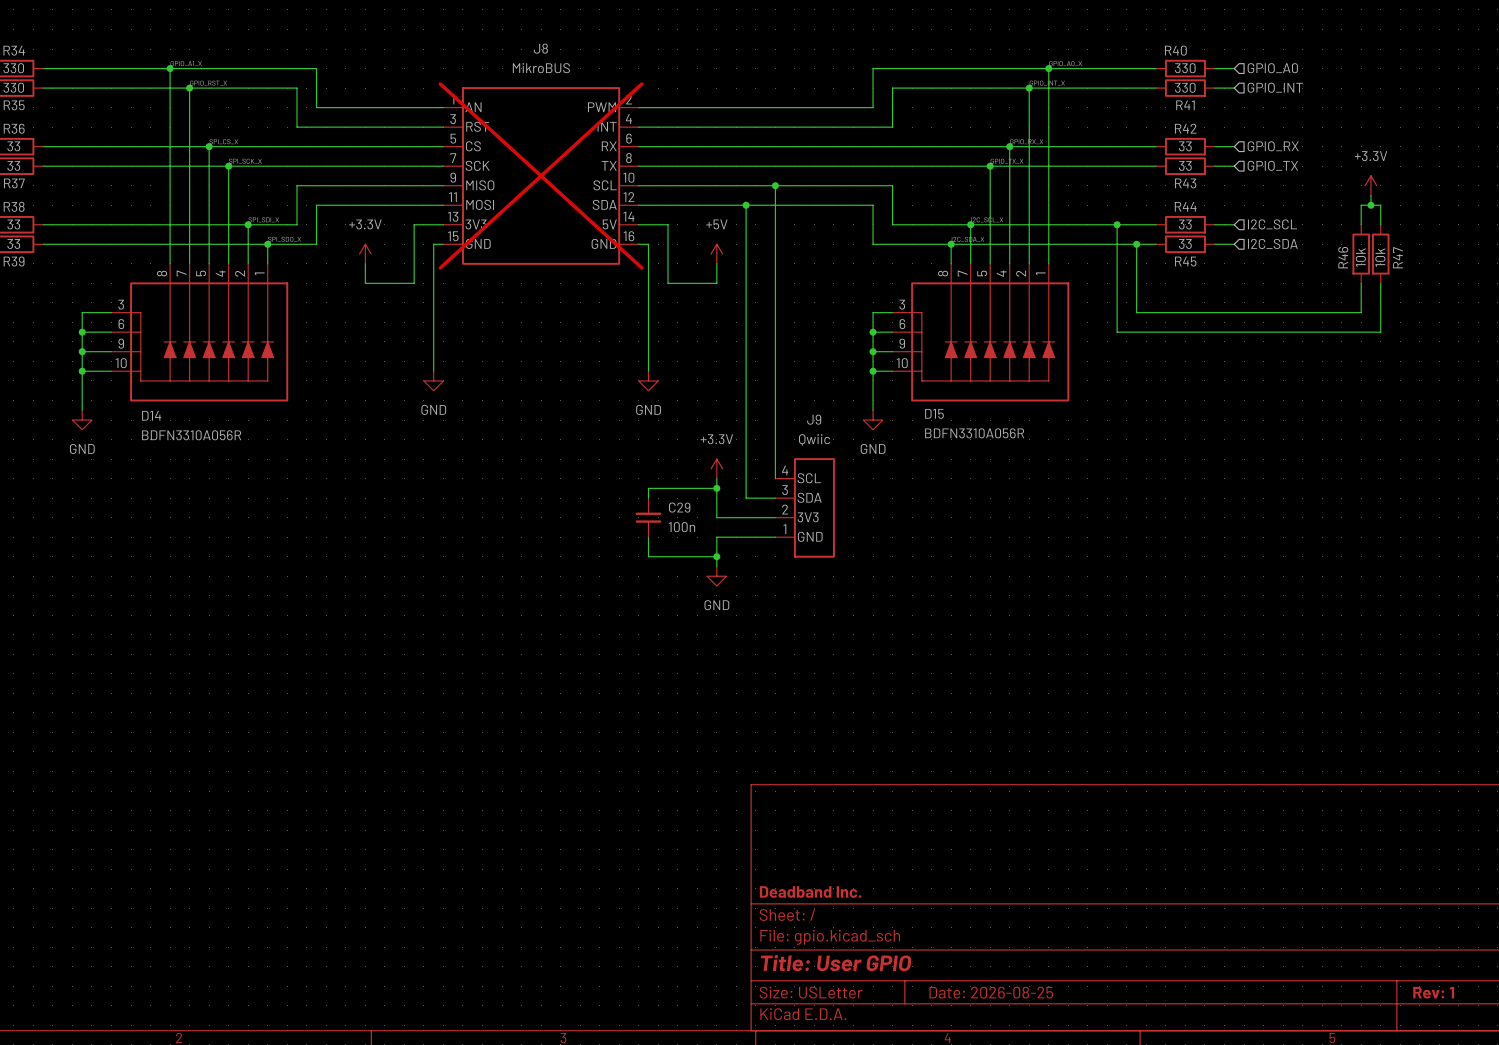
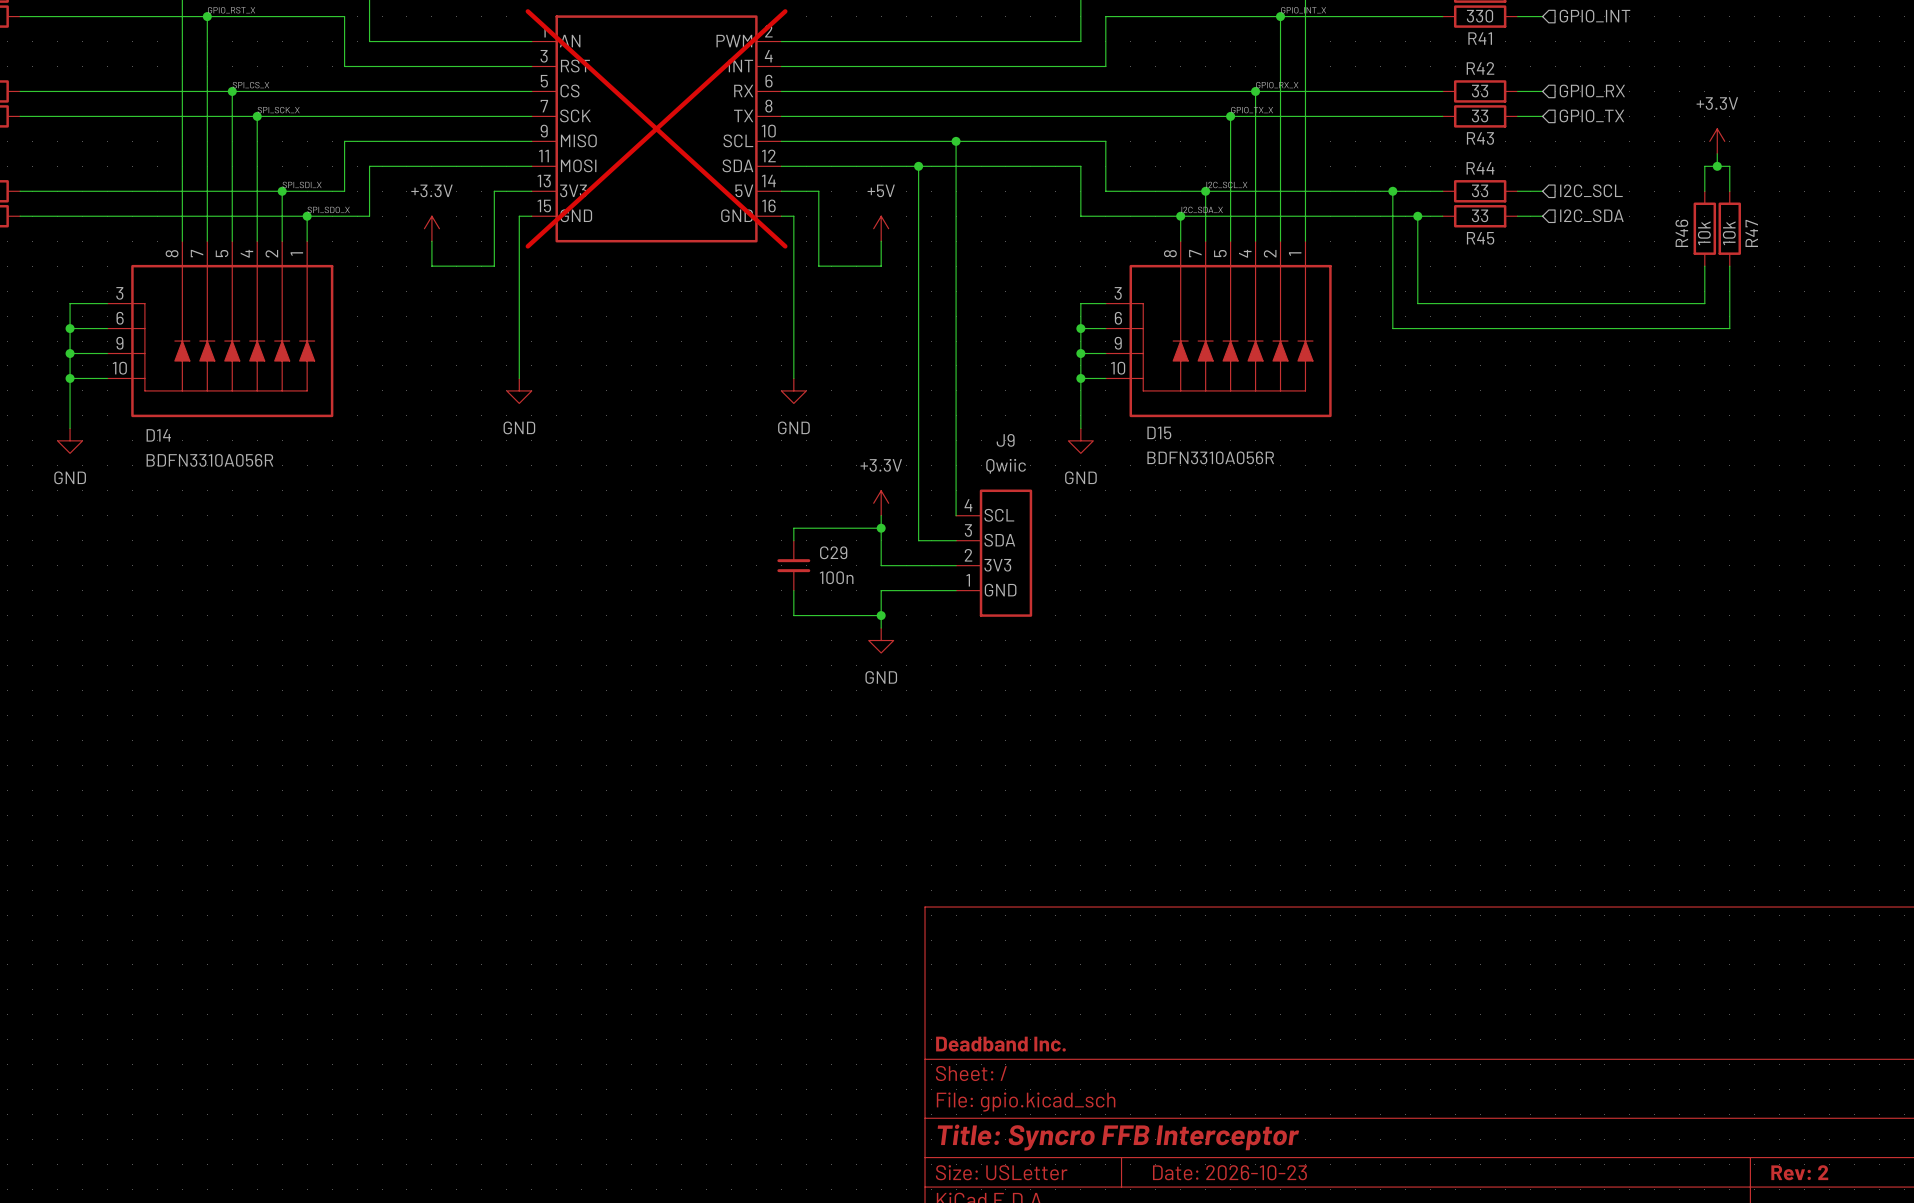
title block: Title: User GPIO (836, 963) -> Title: Syncro FFB Interceptor (1118, 1137)
title block: Date: 2026-08-25 (991, 992) -> Date: 2026-10-23 (1229, 1172)
title block: Rev: 1 (1433, 992) -> Rev: 2 (1799, 1172)

